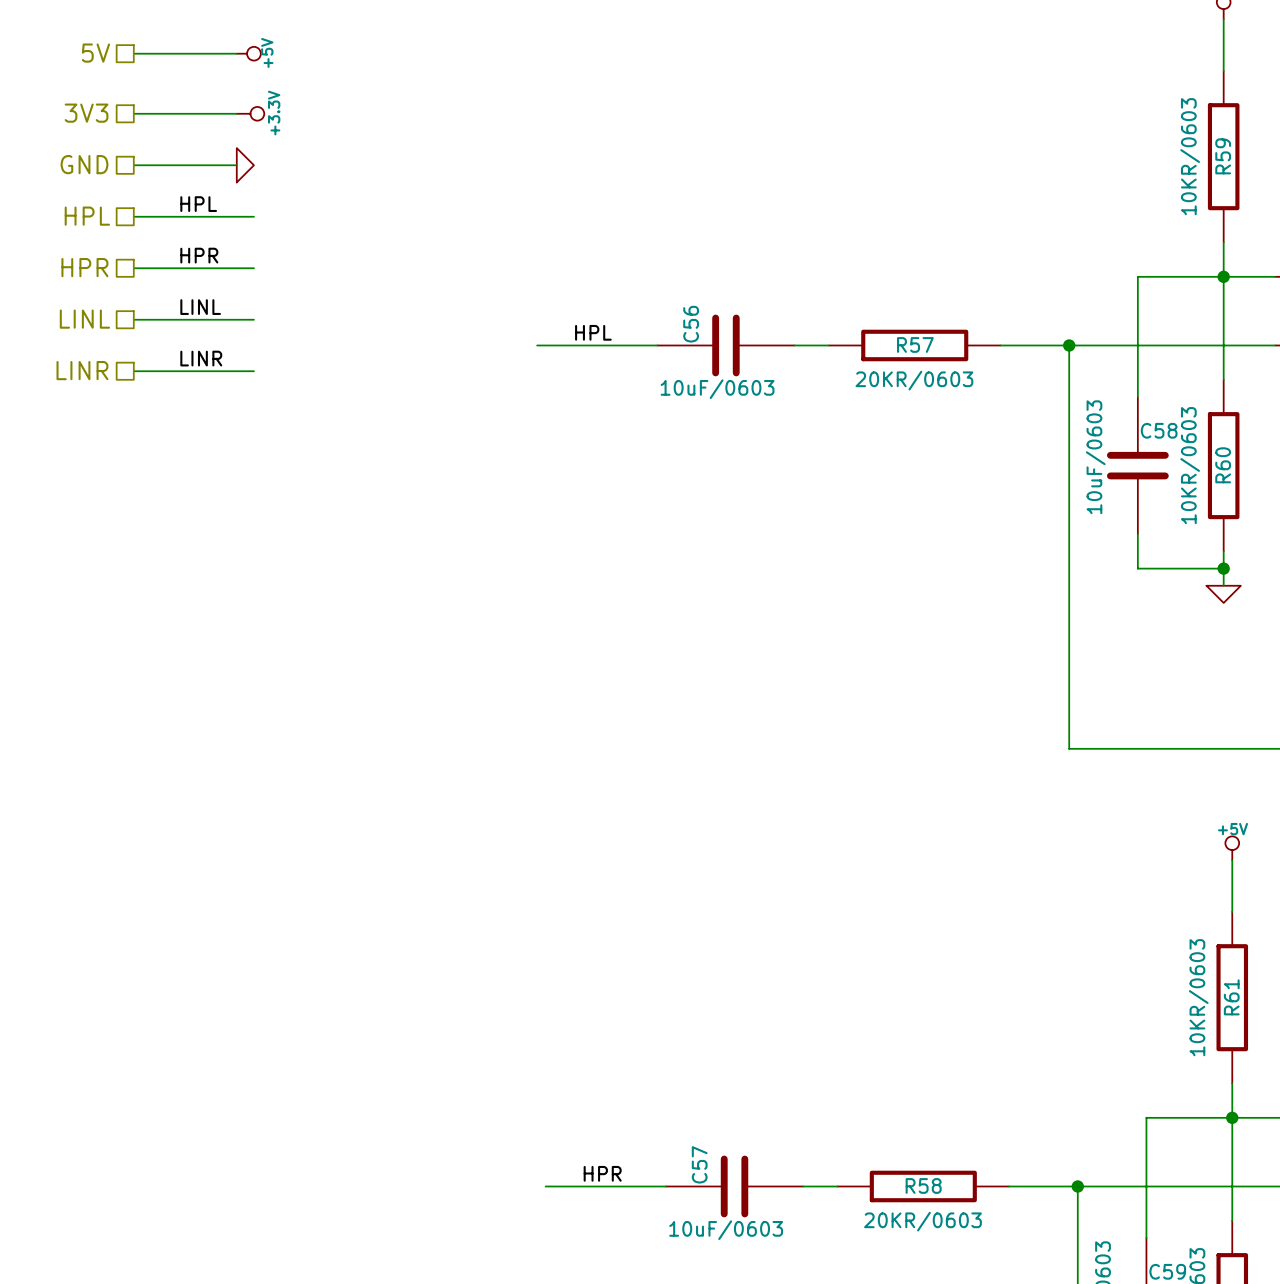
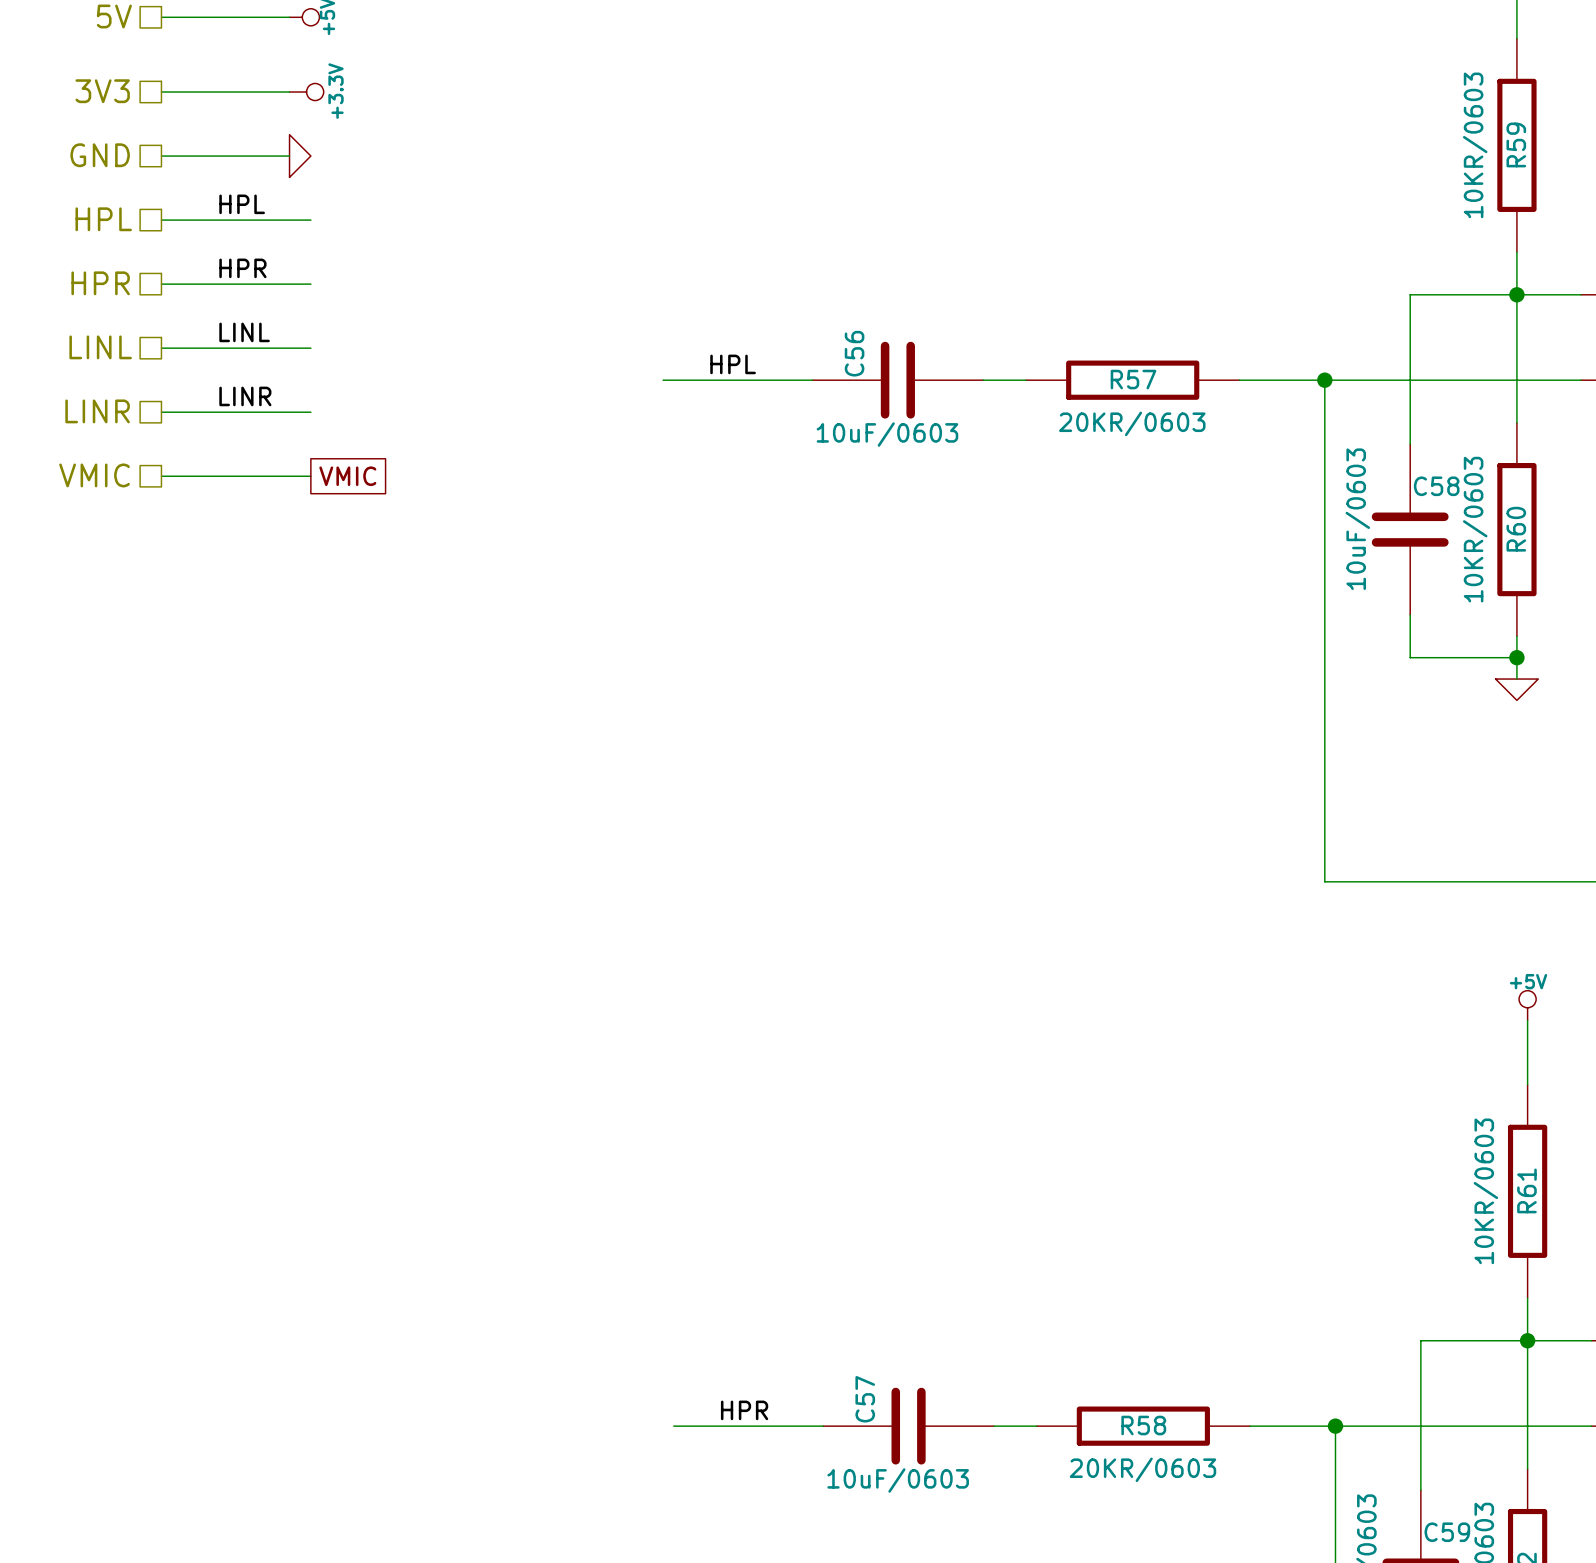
hierarchical label: none -> VMIC (94, 475)
wire: none -> (161, 476) (310, 476)
global label: none -> VMIC (347, 476)

